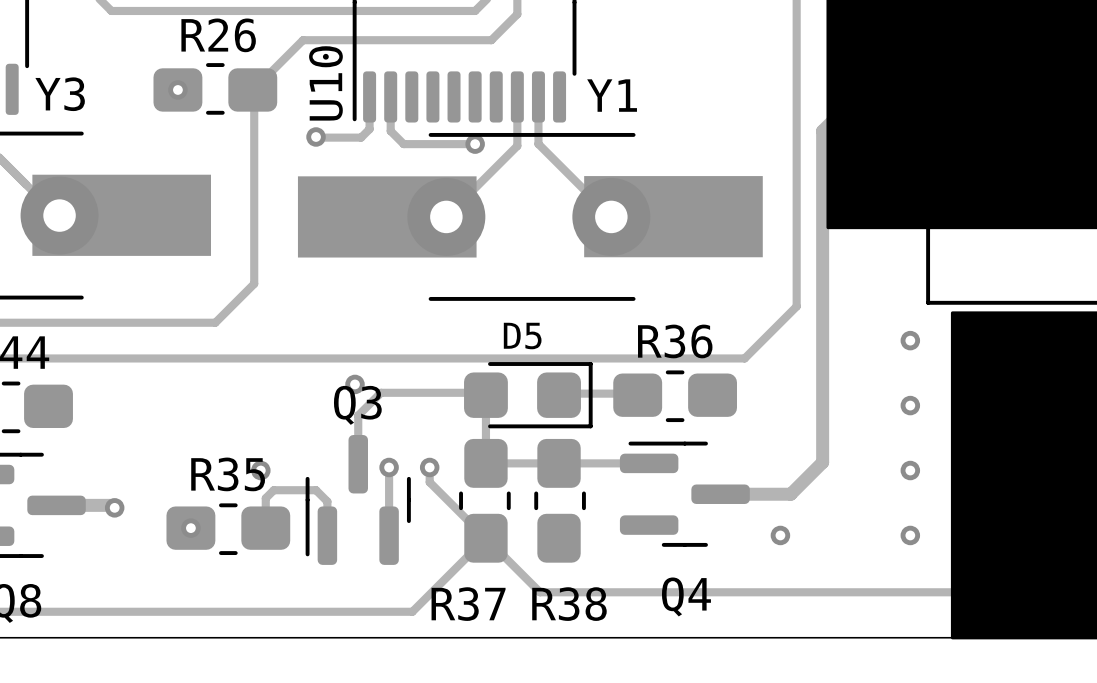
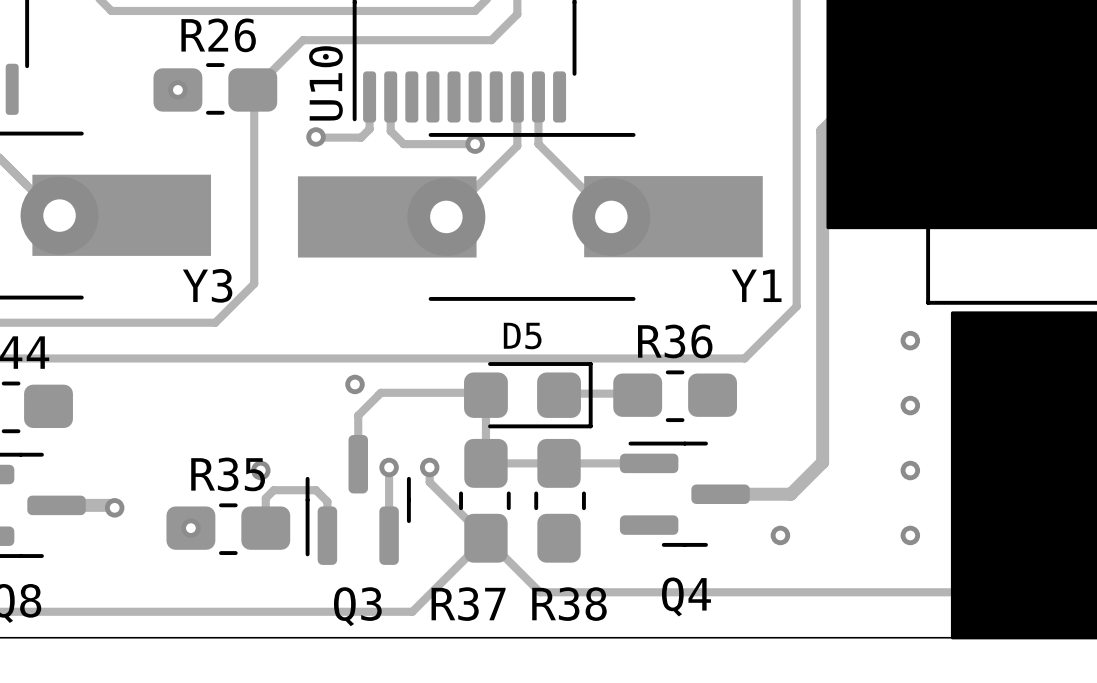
Y3 name position: Y3 (60, 94) -> Y3 (207, 285)
Y1 name position: Y1 (612, 95) -> Y1 (756, 285)
Q3 name position: Q3 (357, 405) -> Q3 (357, 606)

